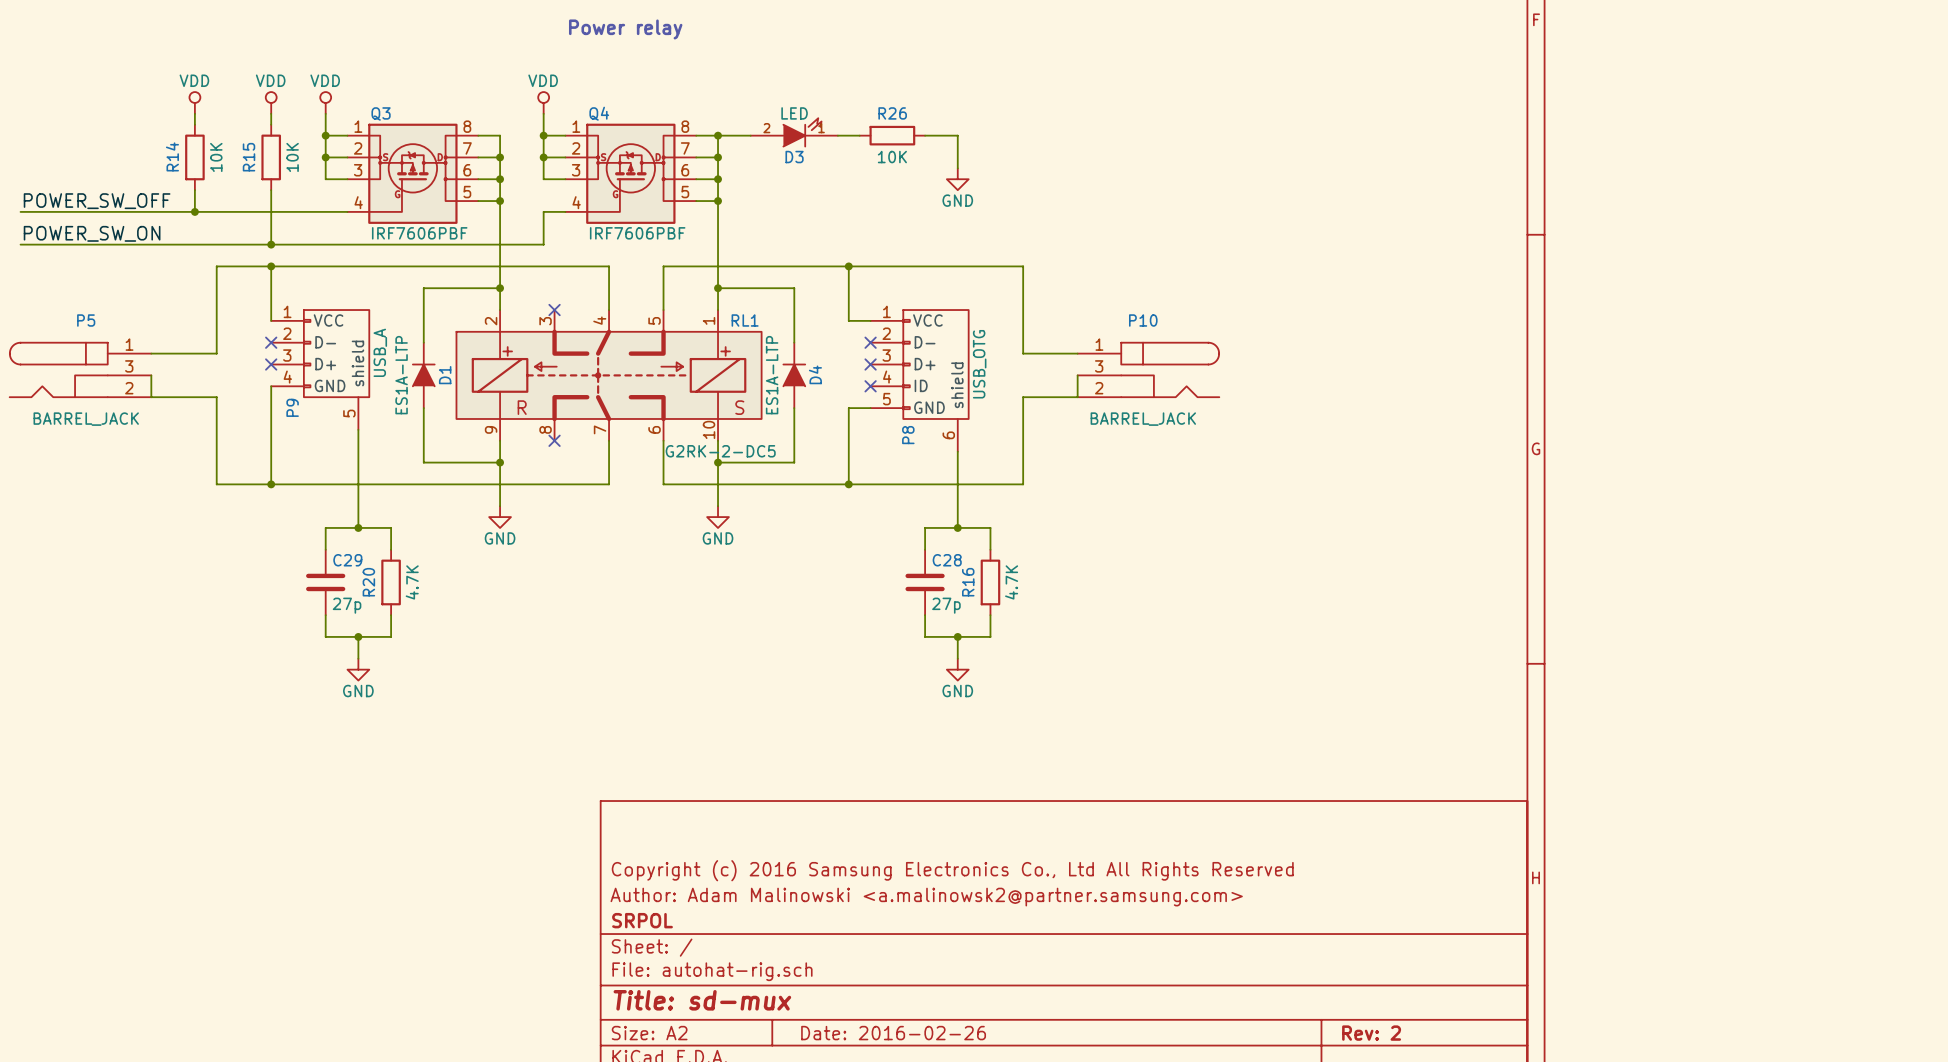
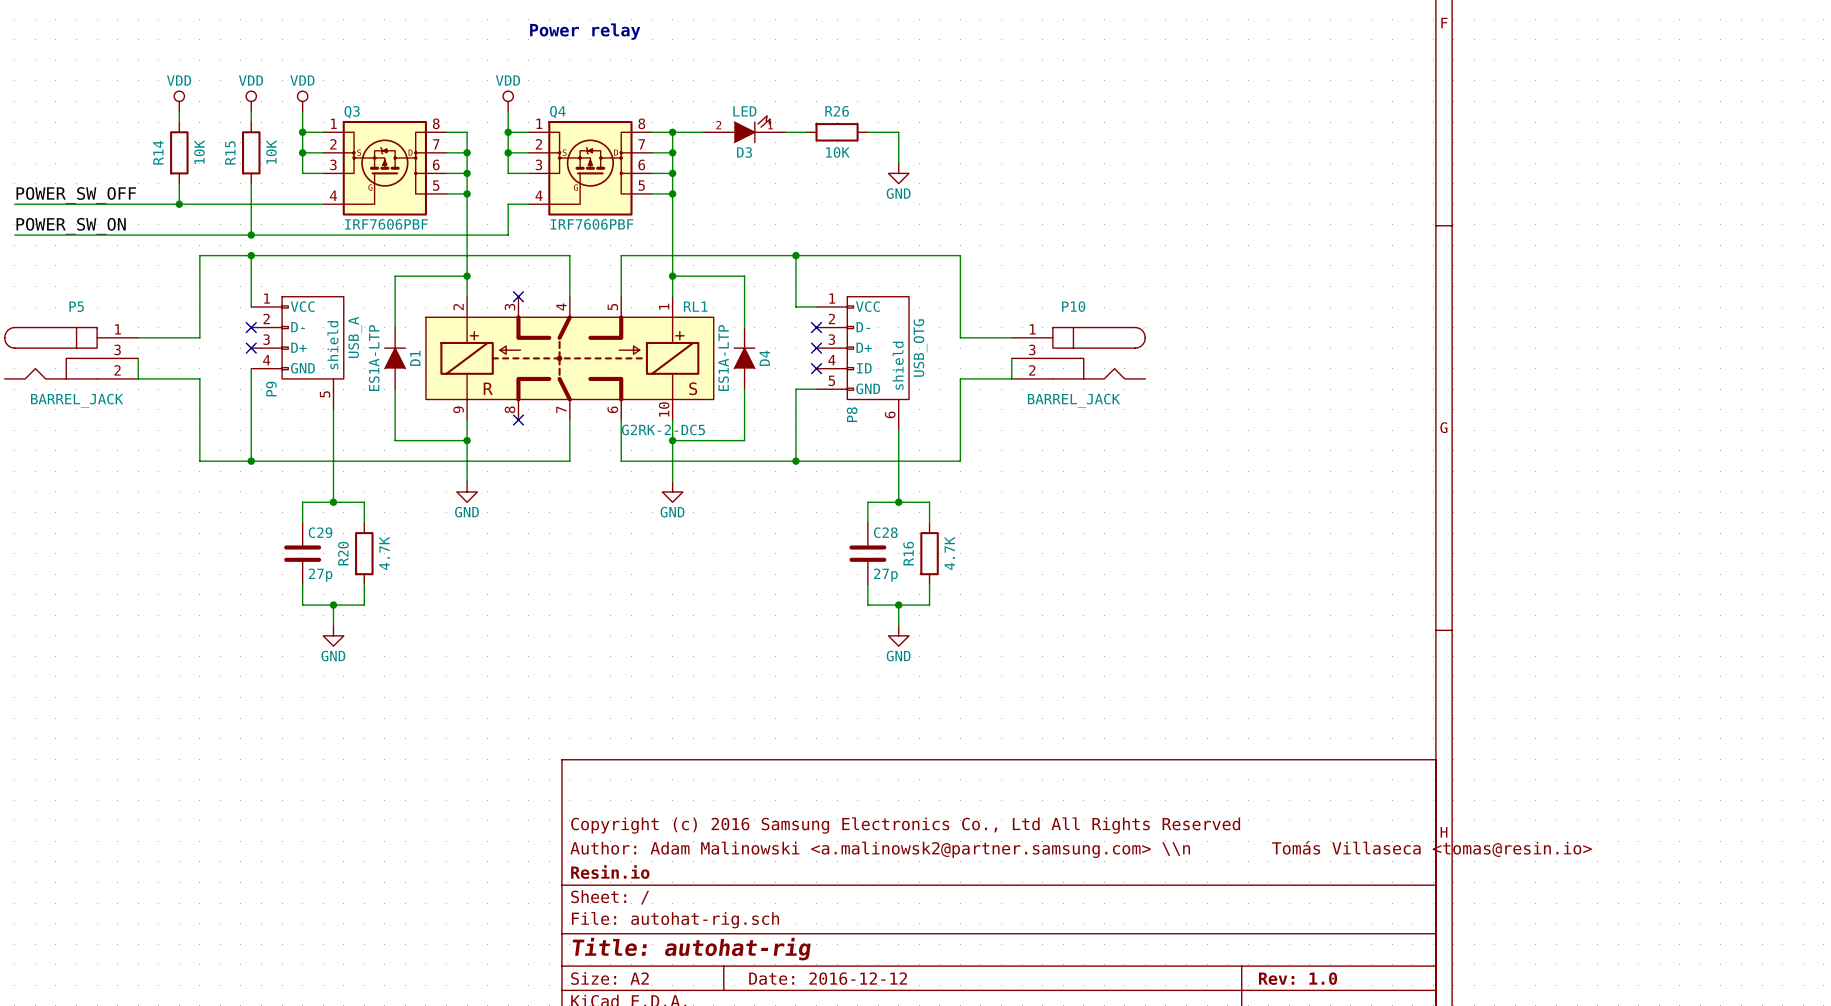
title block: Author: Adam Malinowski <a.malinowsk2@partner.samsung.com> (926, 897) -> Author: Adam Malinowski <a.malinowsk2@partner.samsung.com> \\n Tomás Villaseca <tomas@resin.io> (1081, 849)
title block: SRPOL (642, 920) -> Resin.io (610, 872)
title block: Title: sd-mux (702, 1000) -> Title: autohat-rig (691, 949)
title block: Date: 2016-02-26 (893, 1033) -> Date: 2016-12-12 (828, 978)
title block: Rev: 2 (1371, 1033) -> Rev: 1.0 (1298, 978)

